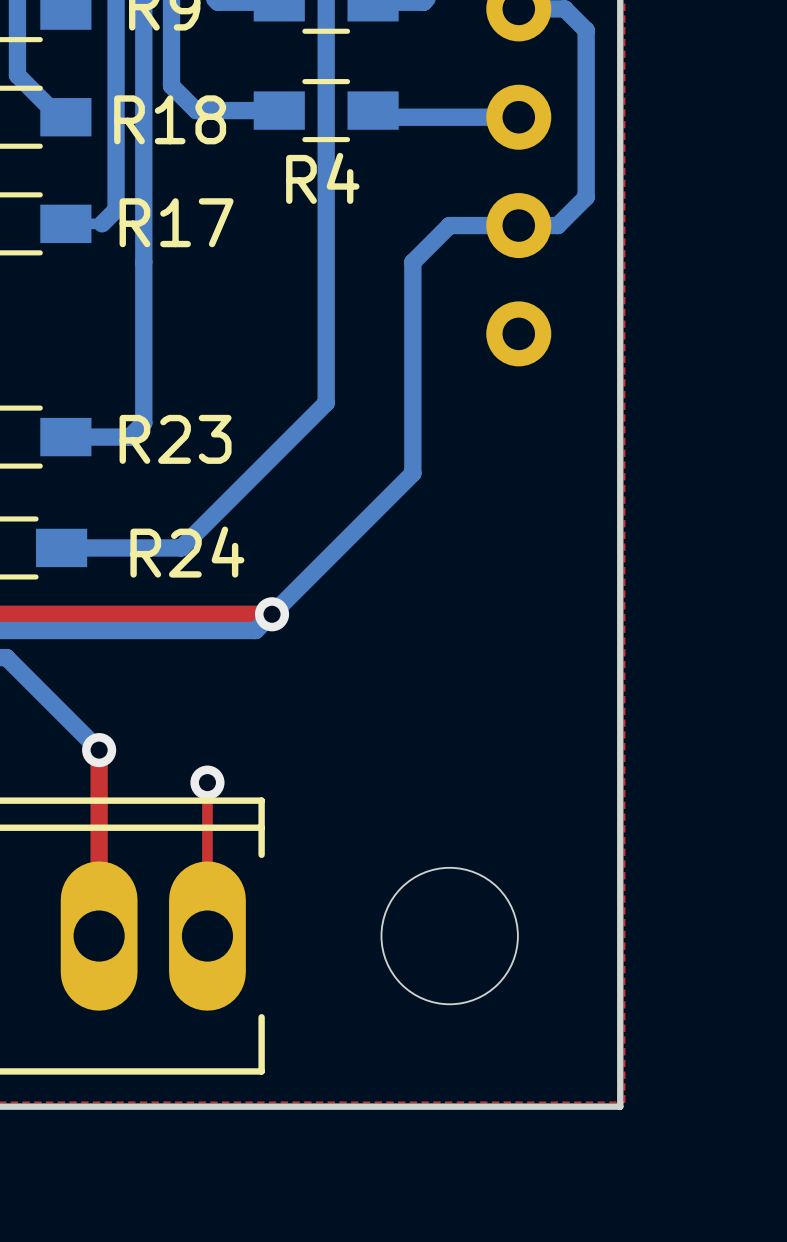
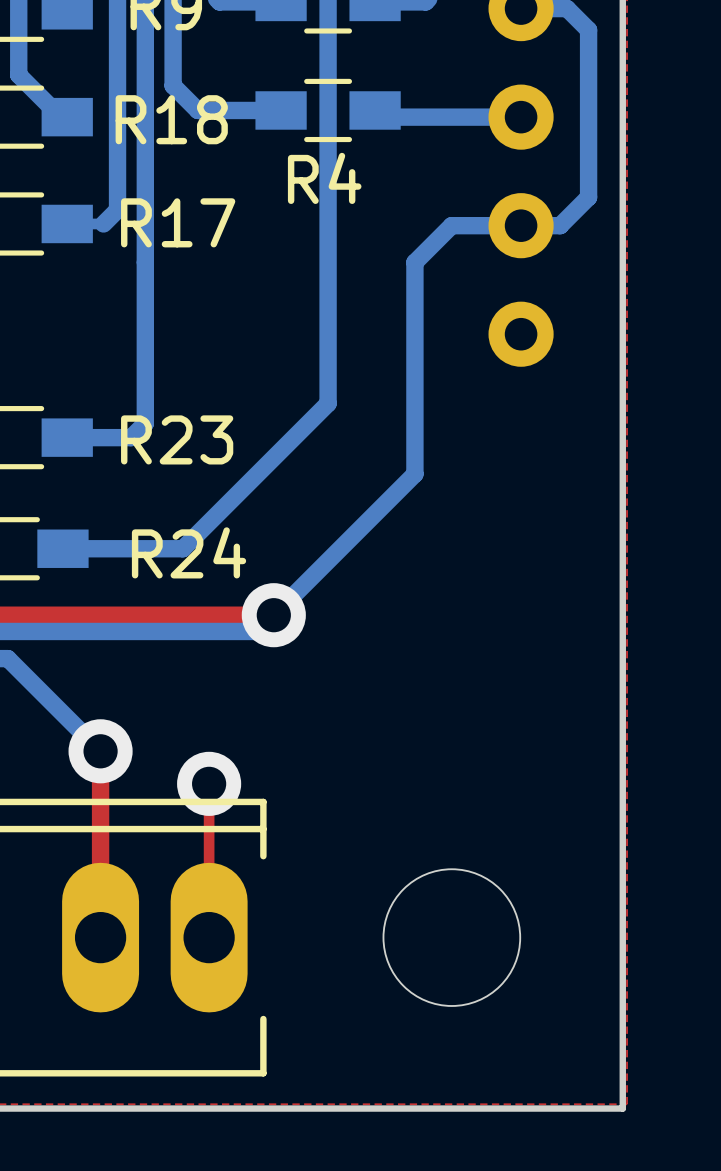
via size: [254, 597, 290, 632] -> [241, 583, 306, 648]
via size: [82, 733, 117, 768] -> [68, 719, 133, 784]
via size: [190, 765, 225, 800] -> [177, 751, 242, 816]

